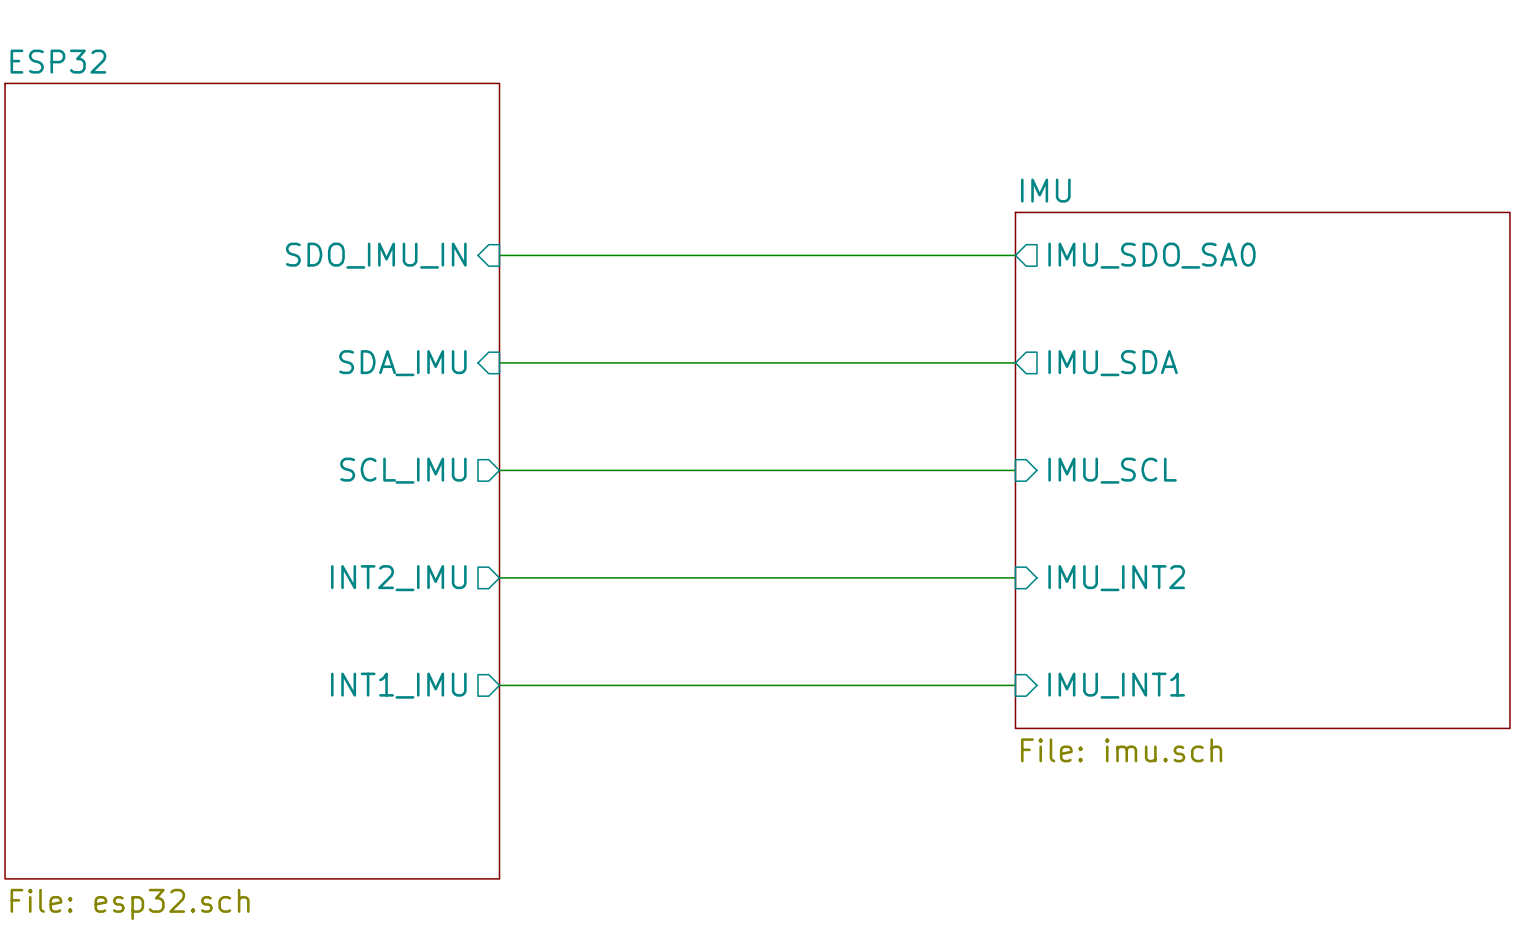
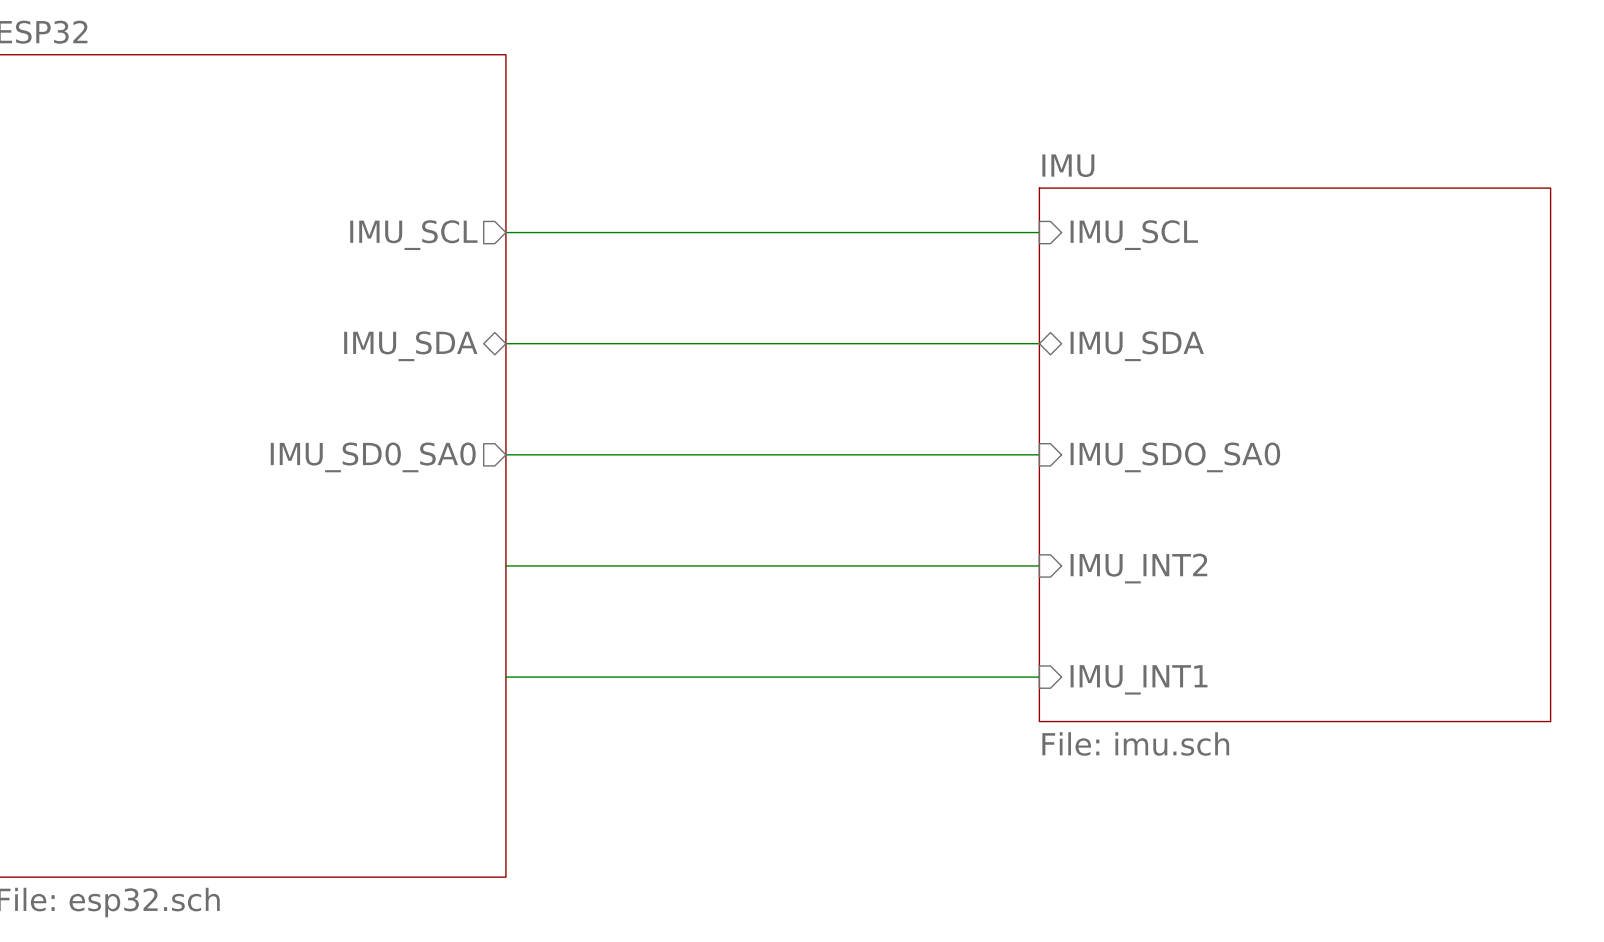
sheet pin shape: input (376, 255) -> output (413, 235)
sheet pin: SDO_IMU_IN (376, 255) -> IMU_SCL (413, 235)
sheet pin shape: output (1151, 255) -> input (1134, 235)
sheet pin: IMU_SDO_SA0 (1151, 255) -> IMU_SCL (1134, 235)
sheet pin shape: input (402, 363) -> bidirectional (410, 346)
sheet pin: SDA_IMU (402, 363) -> IMU_SDA (410, 346)
sheet pin shape: output (1113, 363) -> bidirectional (1137, 346)
sheet pin: SCL_IMU (403, 470) -> IMU_SD0_SA0 (373, 457)
sheet pin: IMU_SCL (1112, 470) -> IMU_SDO_SA0 (1175, 457)
sheet pin: INT2_IMU (398, 578) -> none
sheet pin: INT1_IMU (398, 685) -> none

